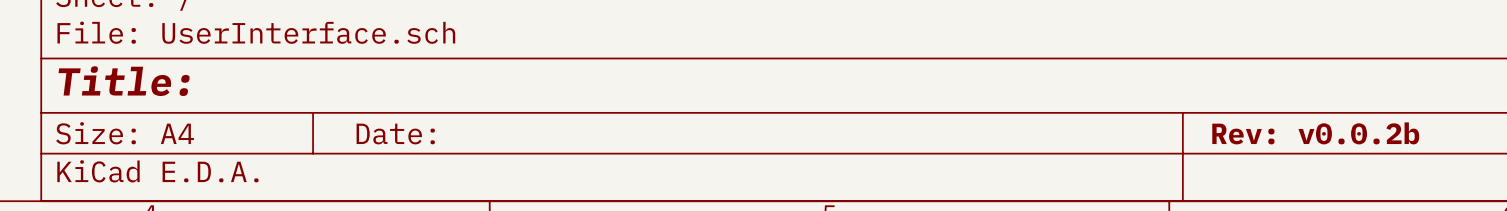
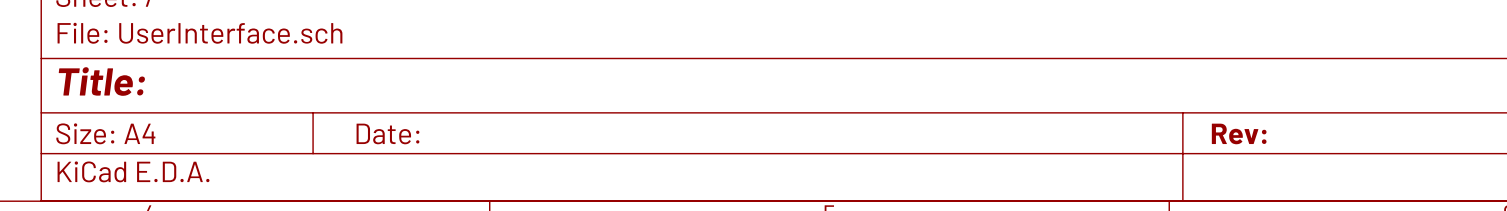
title block: Rev: v0.0.2b (1315, 133) -> Rev: (1239, 133)

